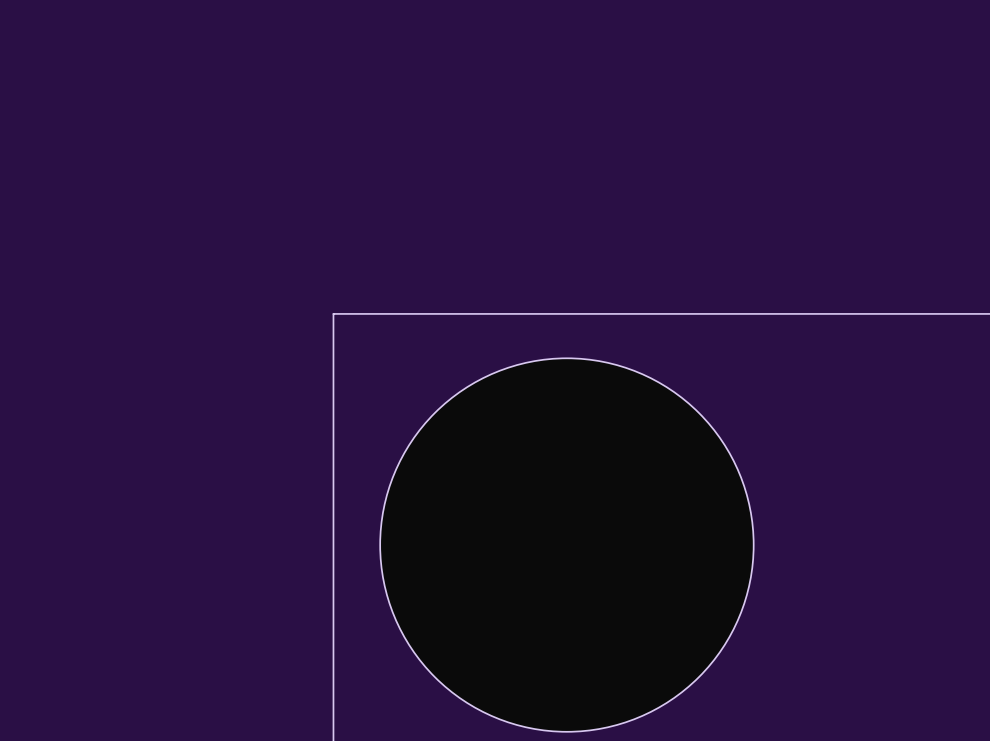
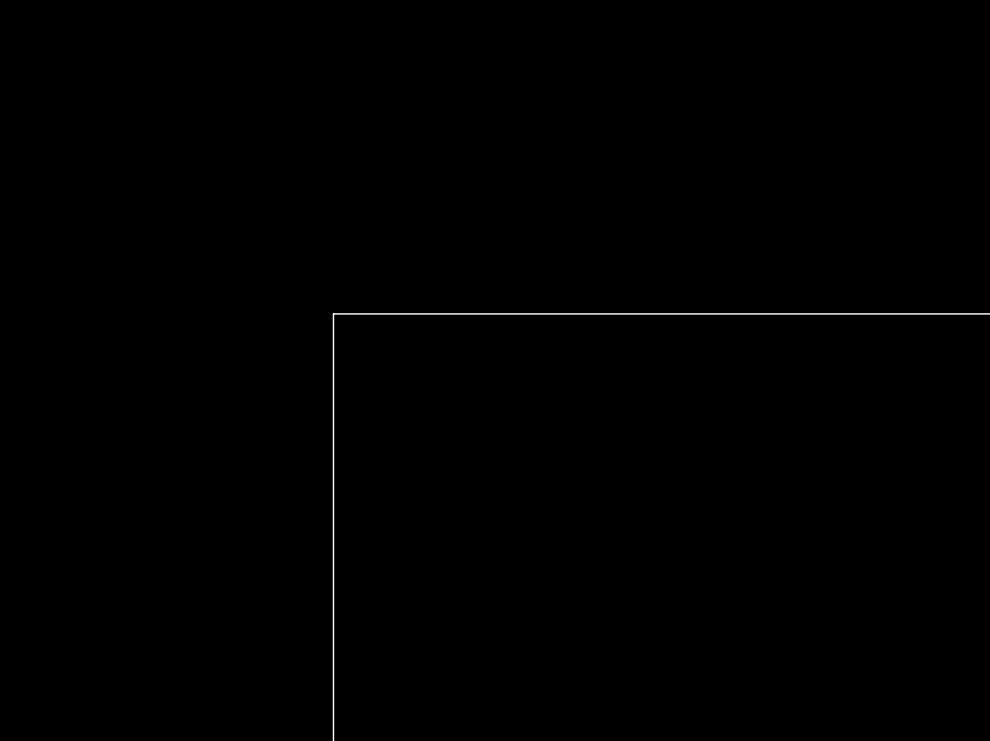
hole: (566, 545) -> none

